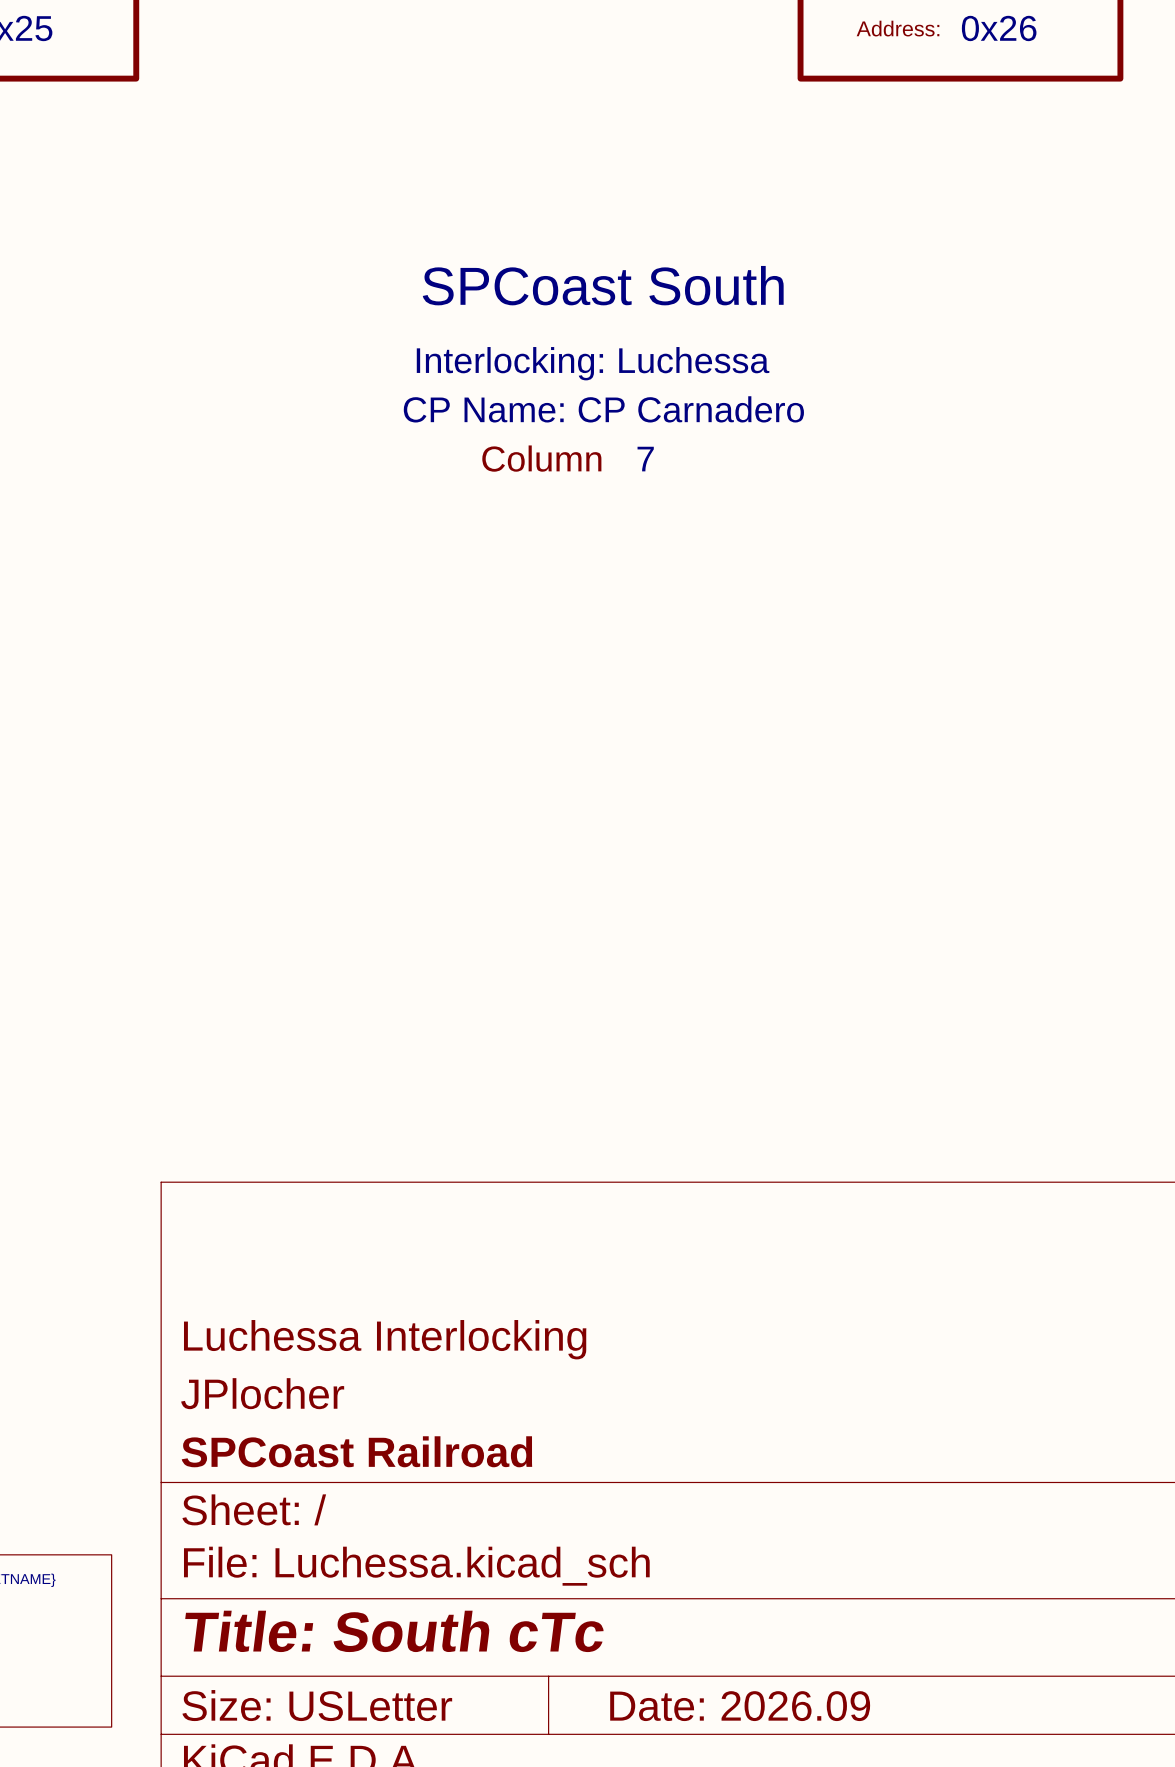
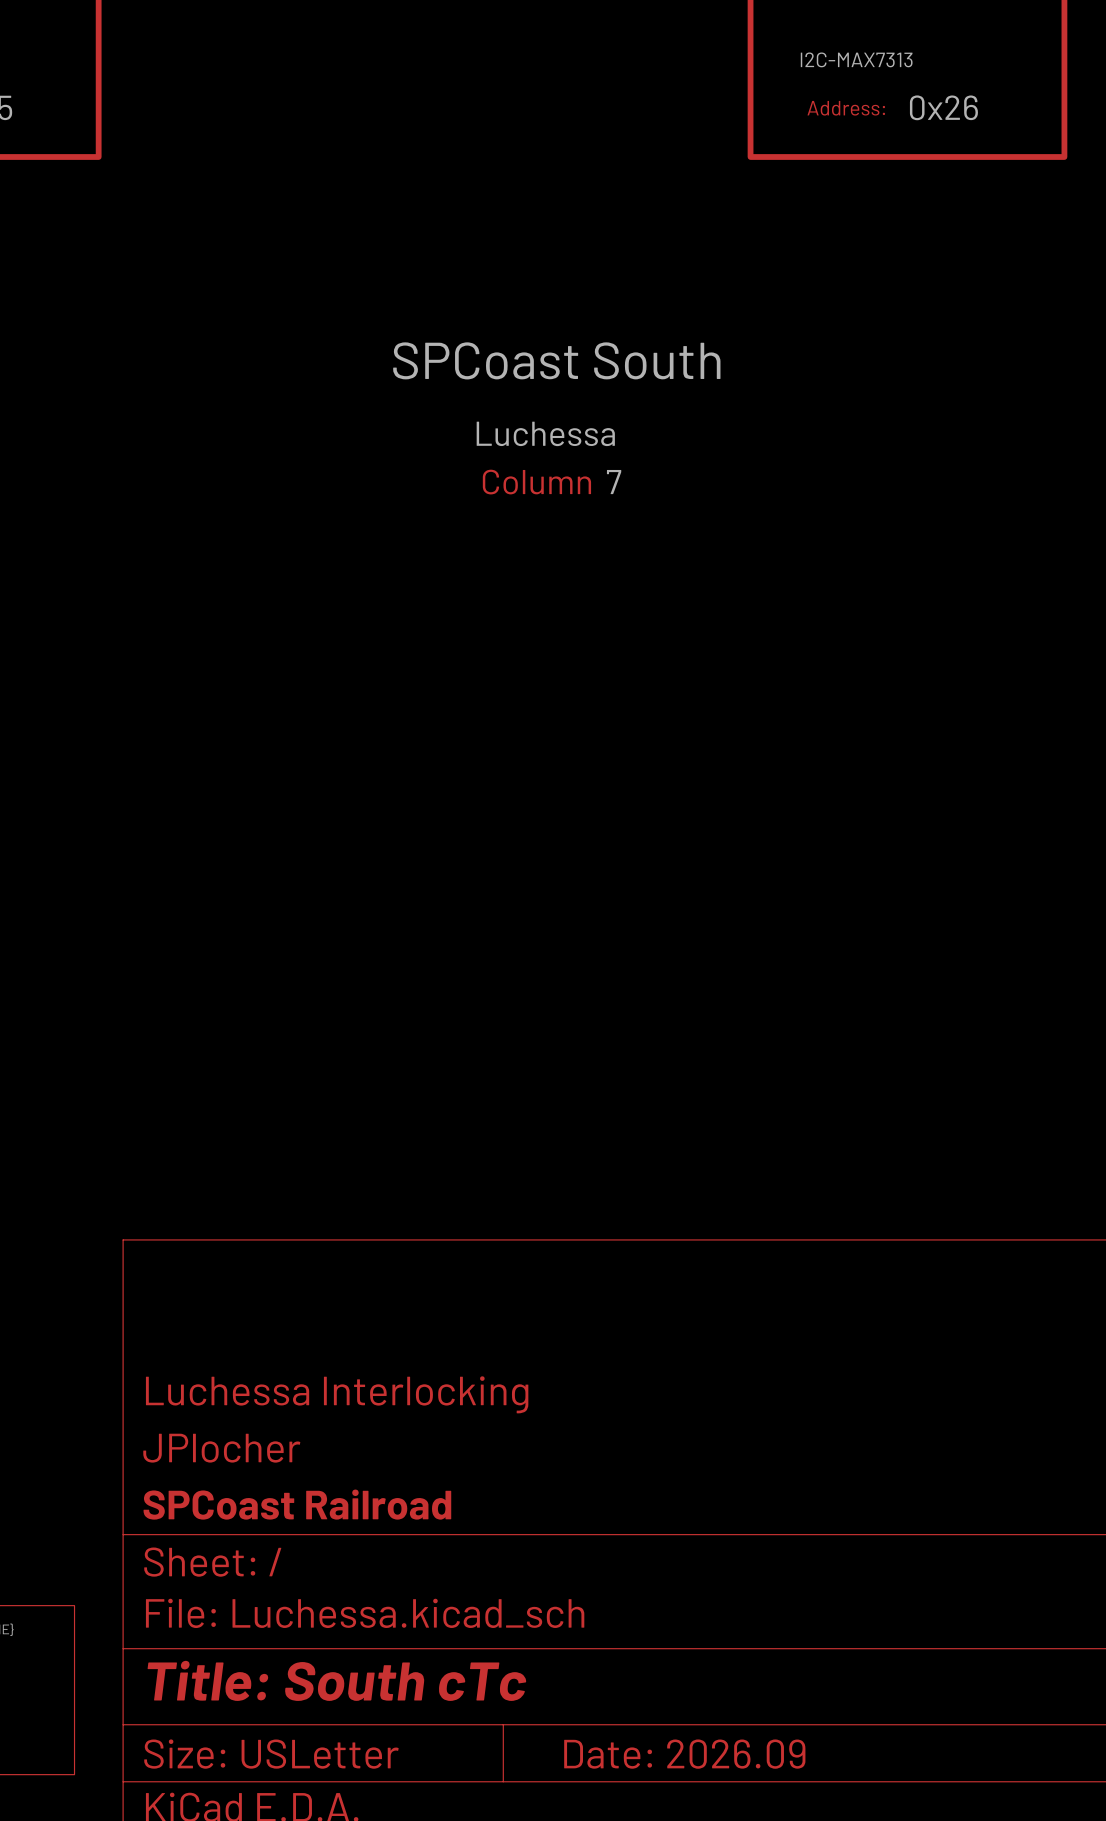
part text: Interlocking: Luchessa (593, 363) -> Luchessa (545, 433)
part text: CP Name: CP Carnadero (603, 409) -> none
part text position: Column (541, 458) -> Column (536, 482)
part value position: 7 (645, 459) -> 7 (614, 482)

